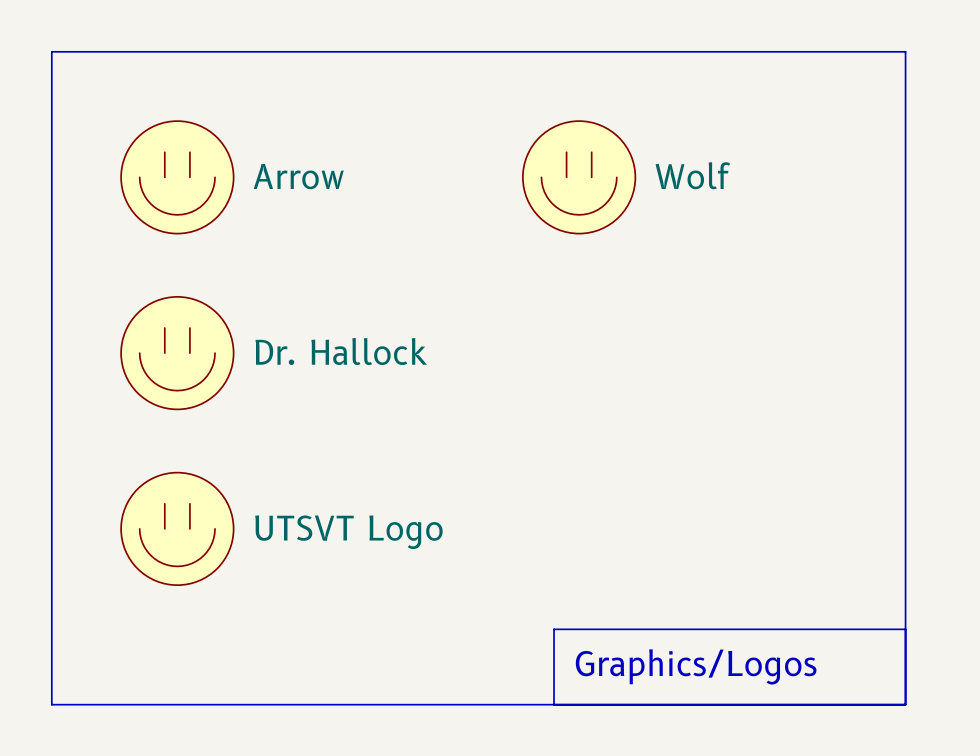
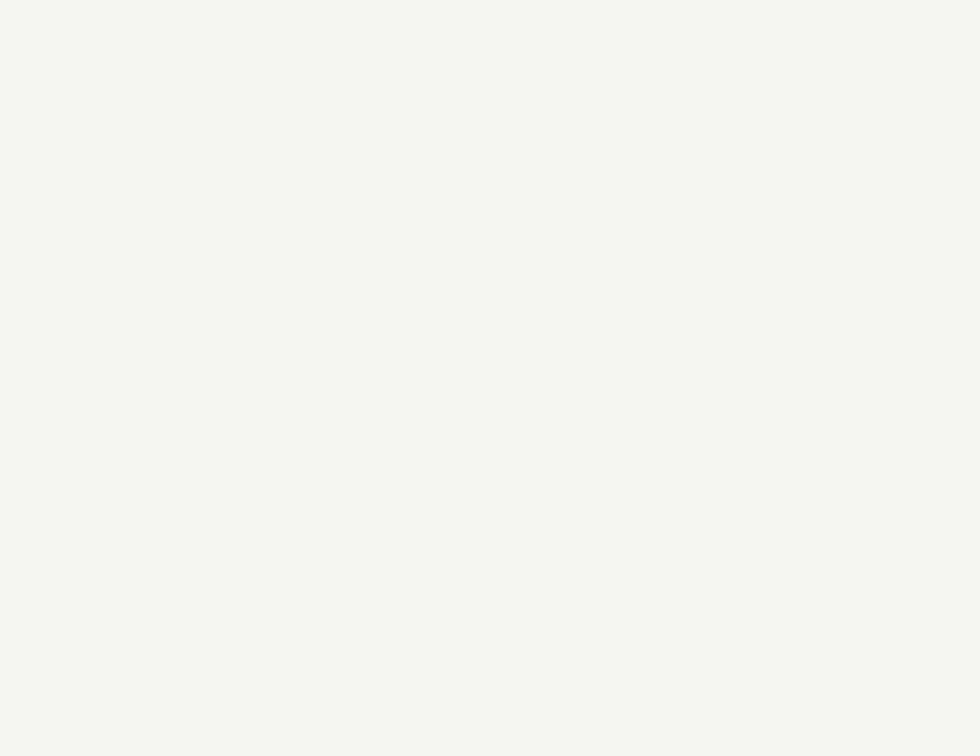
line: (51, 51) (905, 51) (905, 704) (51, 704) (51, 51) -> none
part: Arrow (177, 177) -> none
part: Wolf (579, 177) -> none
part: Dr. Hallock (177, 353) -> none
part: UTSVT Logo (177, 528) -> none
line: (905, 629) (554, 629) (554, 704) -> none
text: Graphics/Logos (696, 666) -> none

